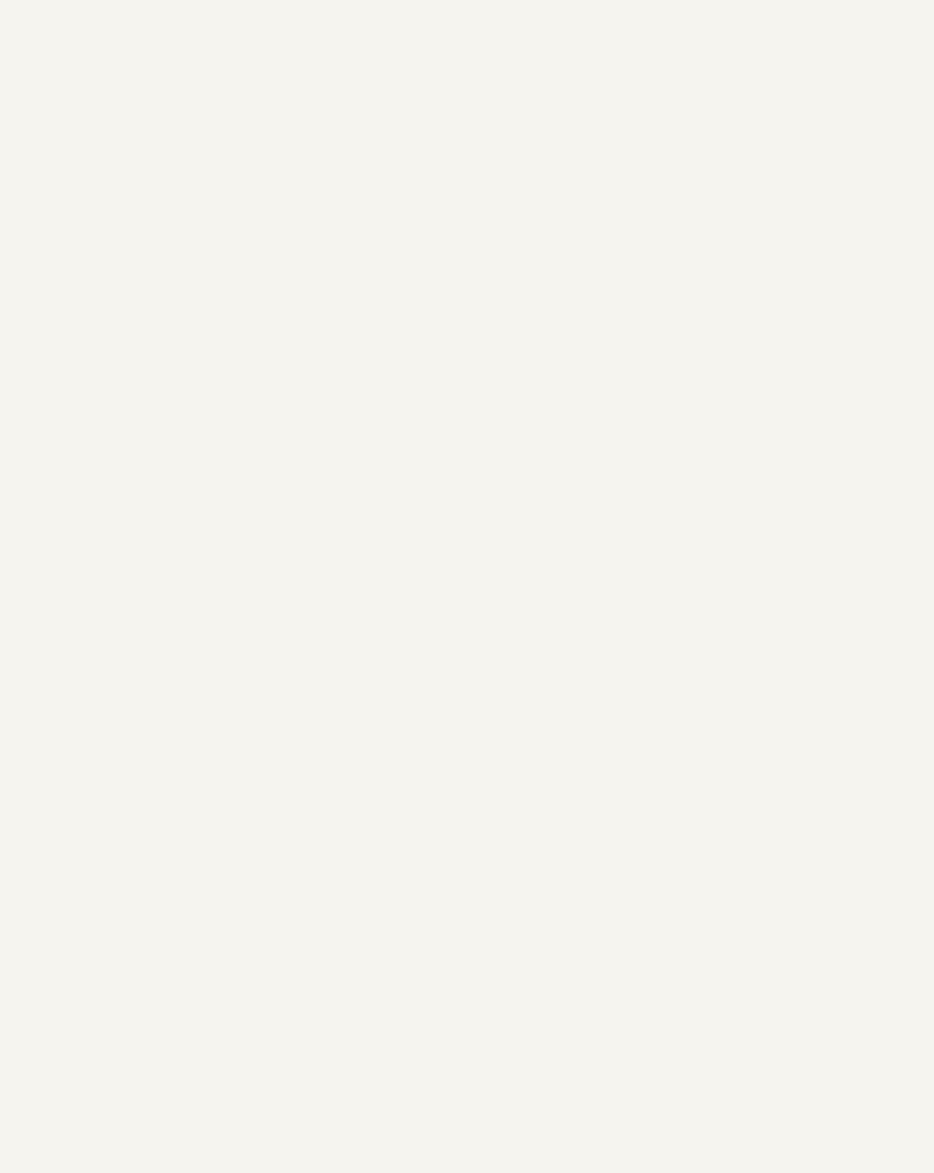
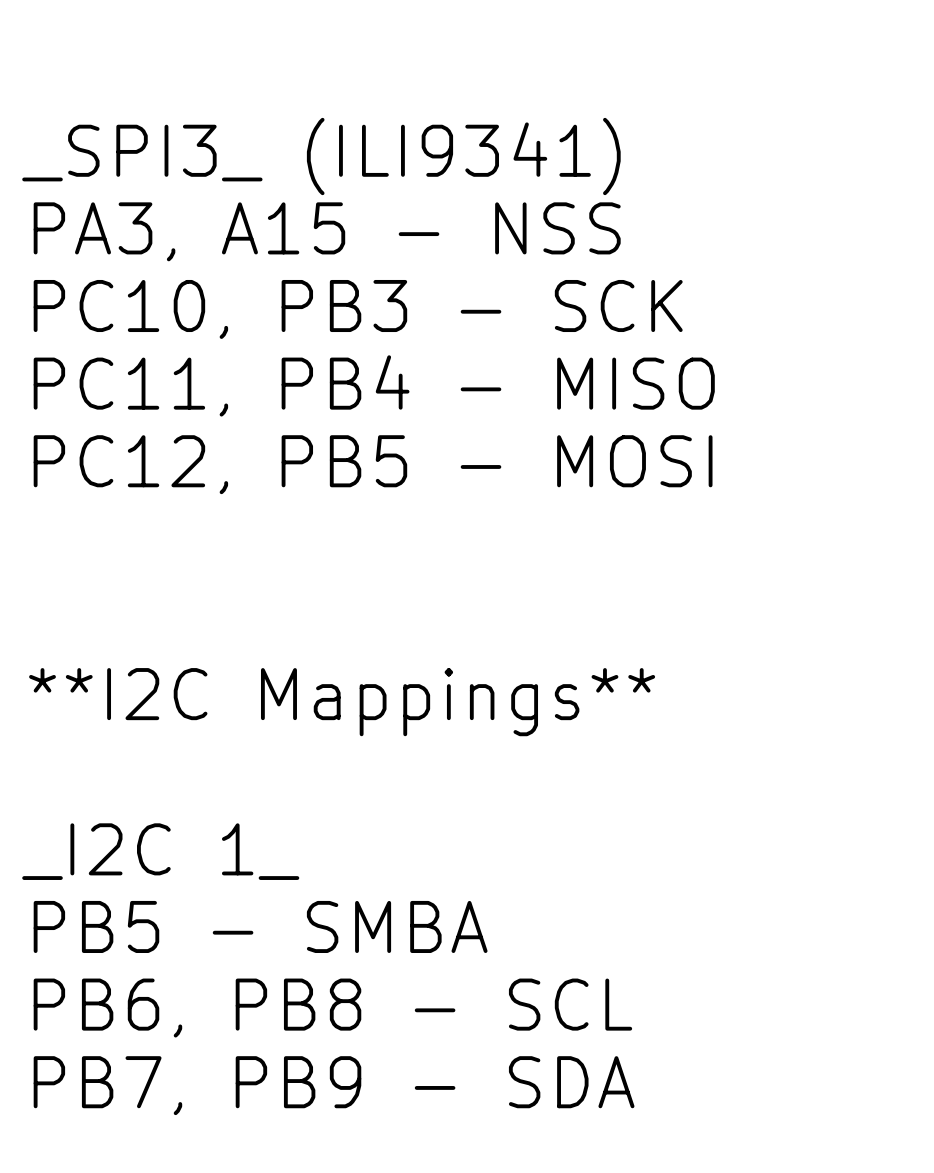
text: none -> _SPI3_ (ILI9341) (321, 156)
text: none -> PA3, A15 - NSS (327, 231)
text: none -> PC10, PB3 - SCK (358, 309)
text: none -> PC11, PB4 - MISO (374, 385)
text: none -> PC12, PB5 - MOSI (373, 464)
text: none -> **I2C Mappings** (342, 702)
text: none -> _I2C 1_ (160, 851)
text: none -> PB5 - SMBA (260, 926)
text: none -> PB6, PB8 - SCL (332, 1008)
text: none -> PB7, PB9 - SDA (334, 1085)

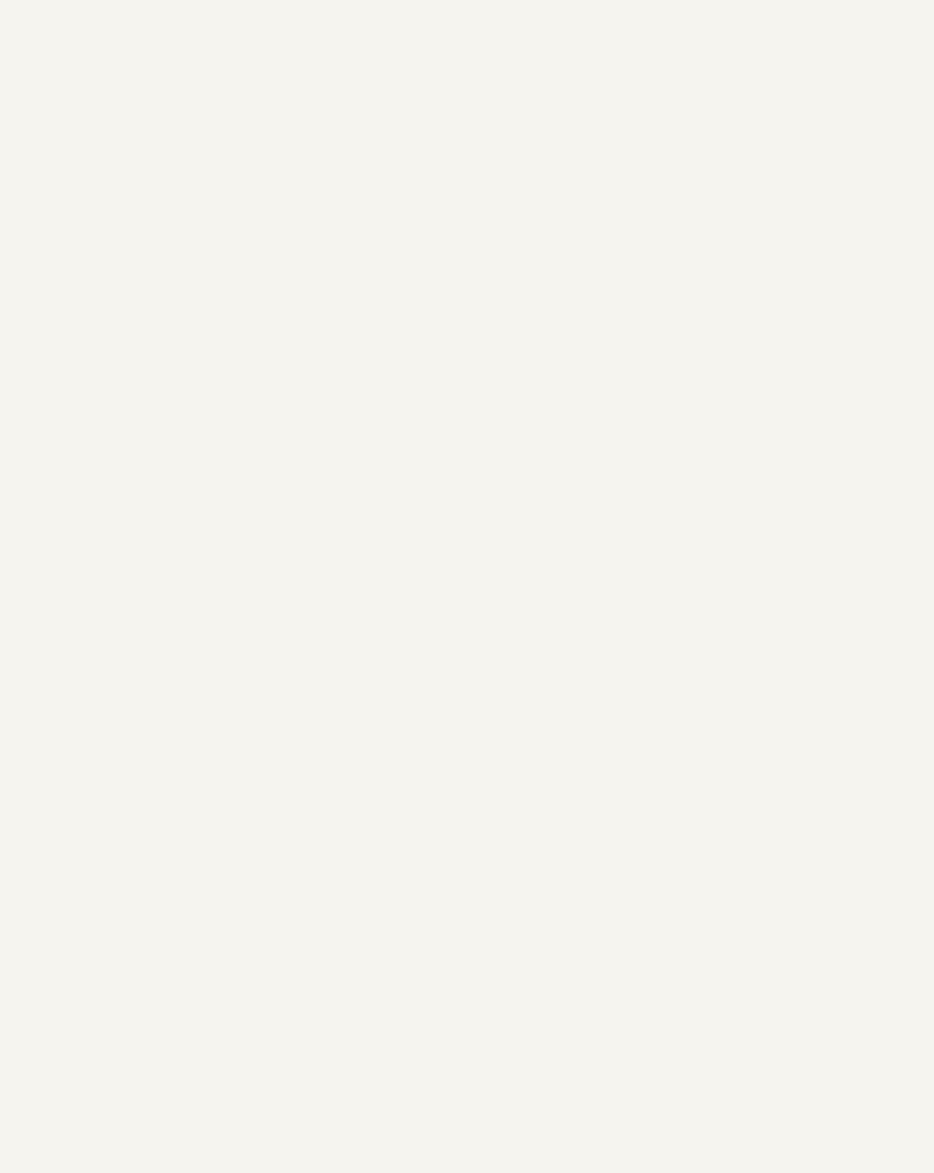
text: _SPI3_ (ILI9341) (321, 156) -> none
text: PA3, A15 - NSS (327, 231) -> none
text: PC10, PB3 - SCK (358, 309) -> none
text: PC11, PB4 - MISO (374, 385) -> none
text: PC12, PB5 - MOSI (373, 464) -> none
text: **I2C Mappings** (342, 702) -> none
text: _I2C 1_ (160, 851) -> none
text: PB5 - SMBA (260, 926) -> none
text: PB6, PB8 - SCL (332, 1008) -> none
text: PB7, PB9 - SDA (334, 1085) -> none

